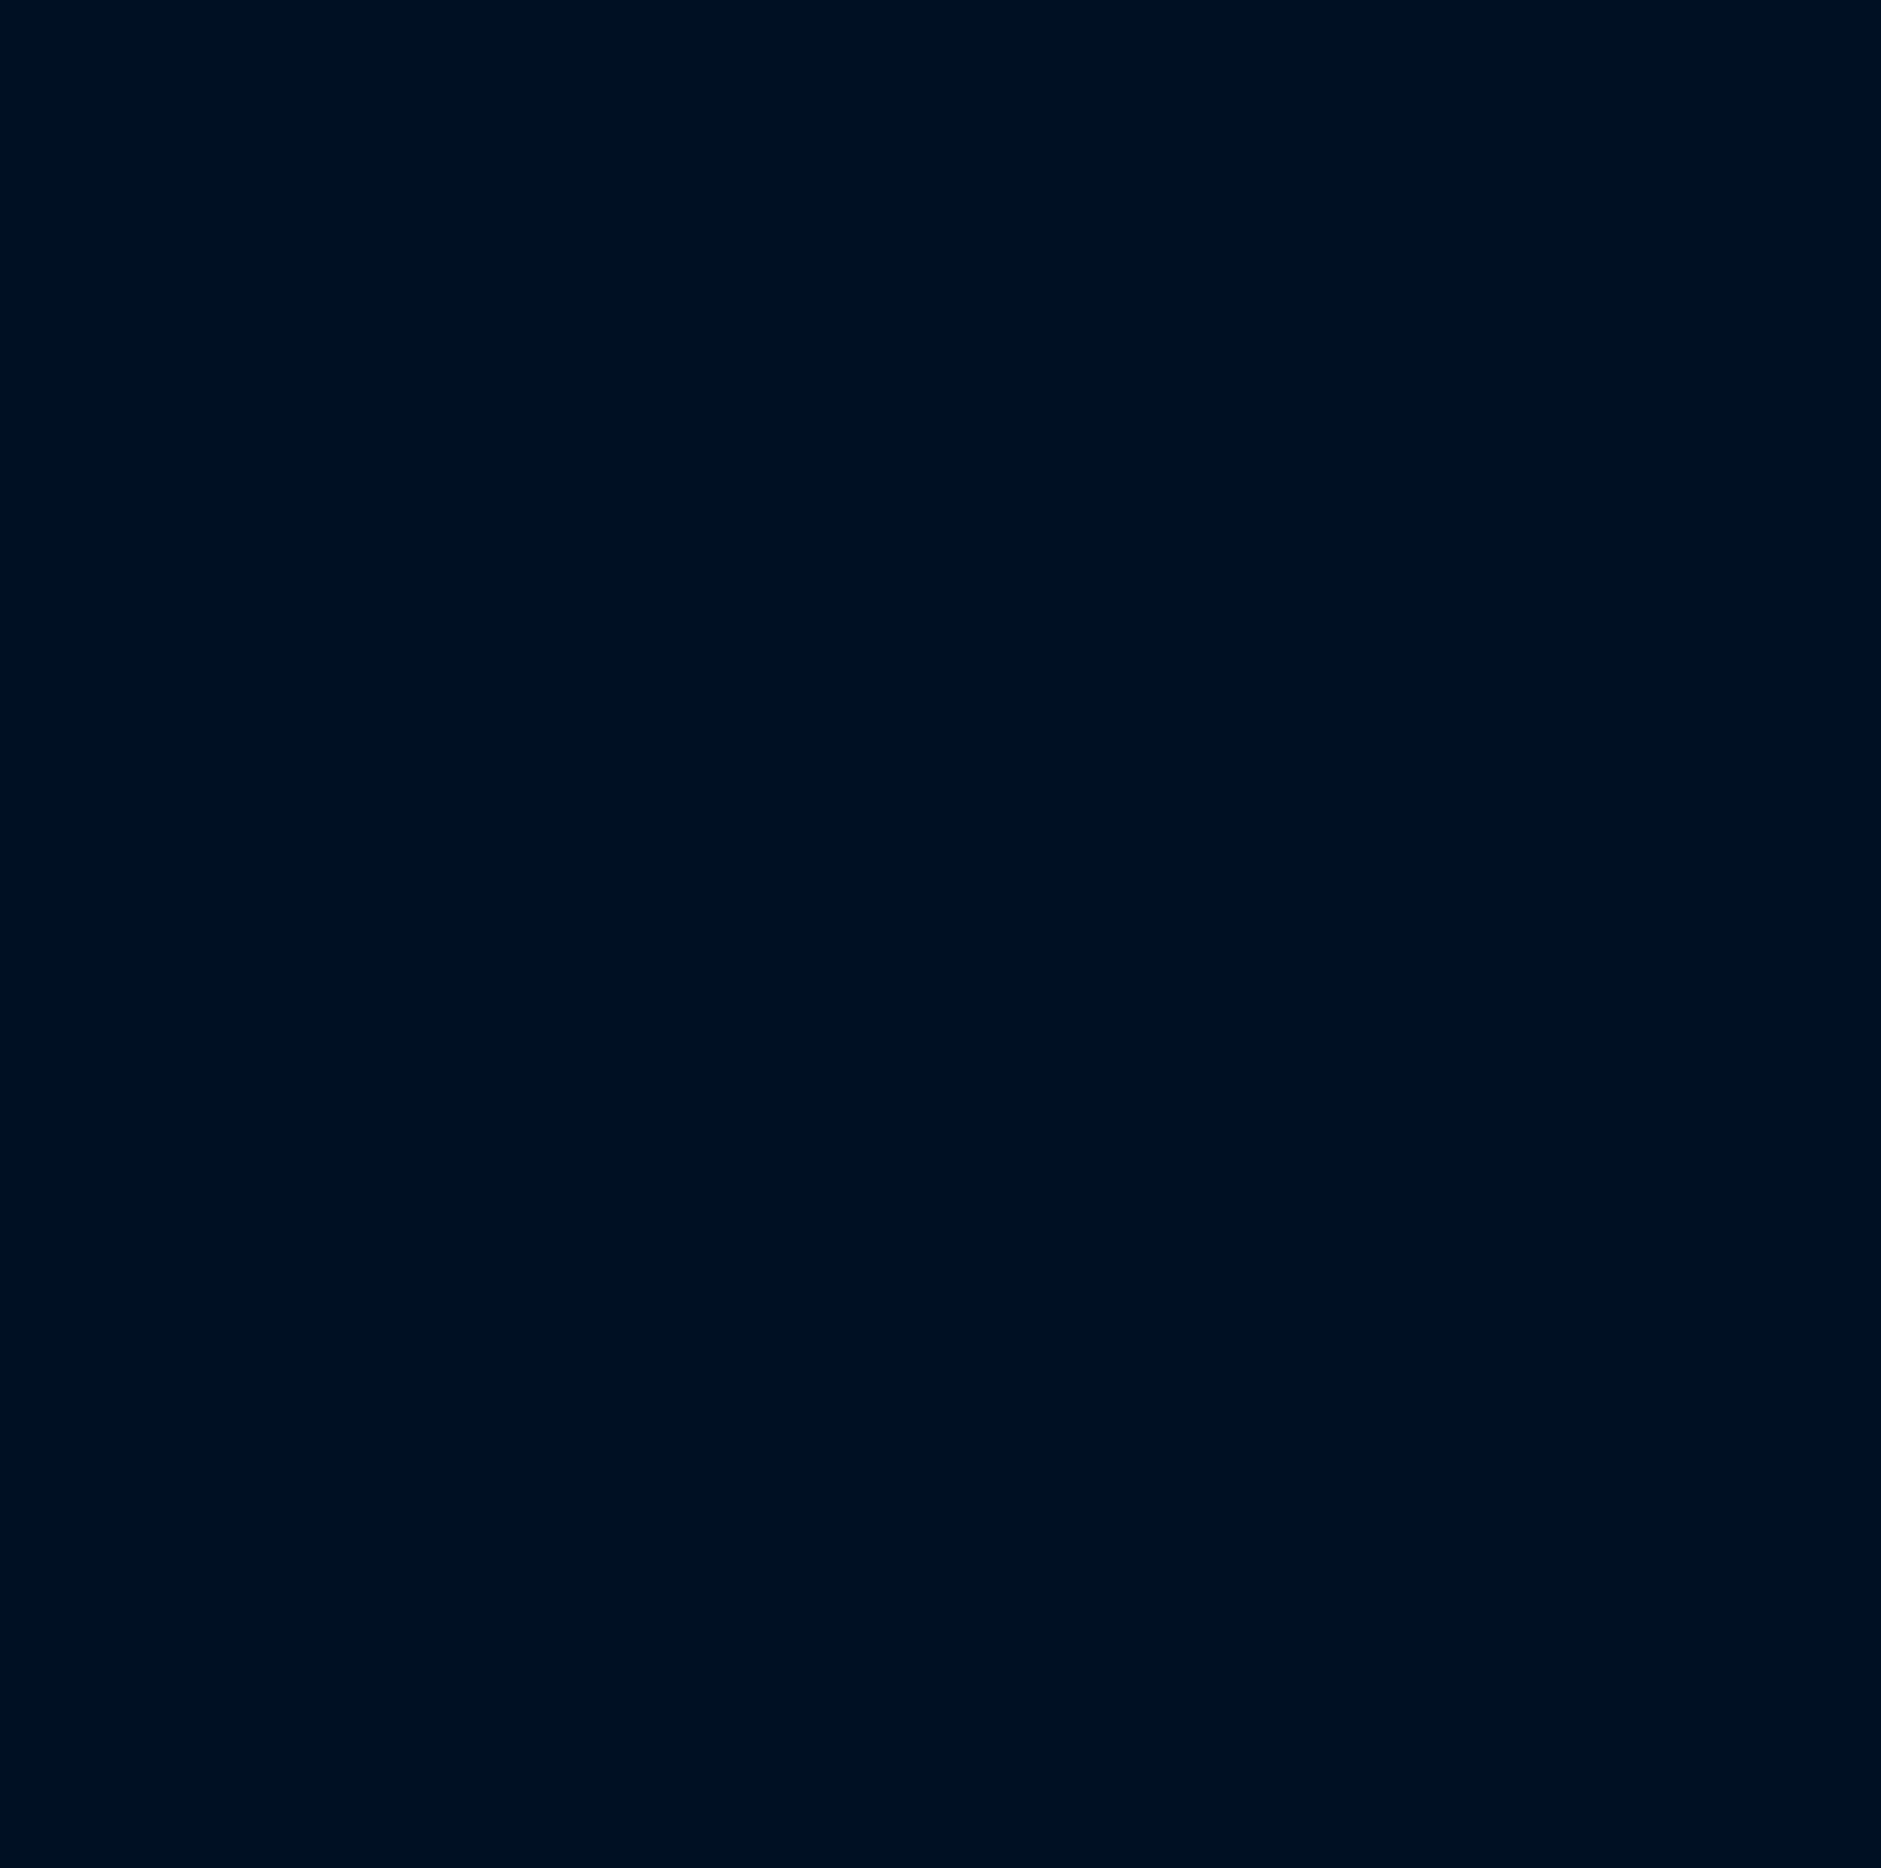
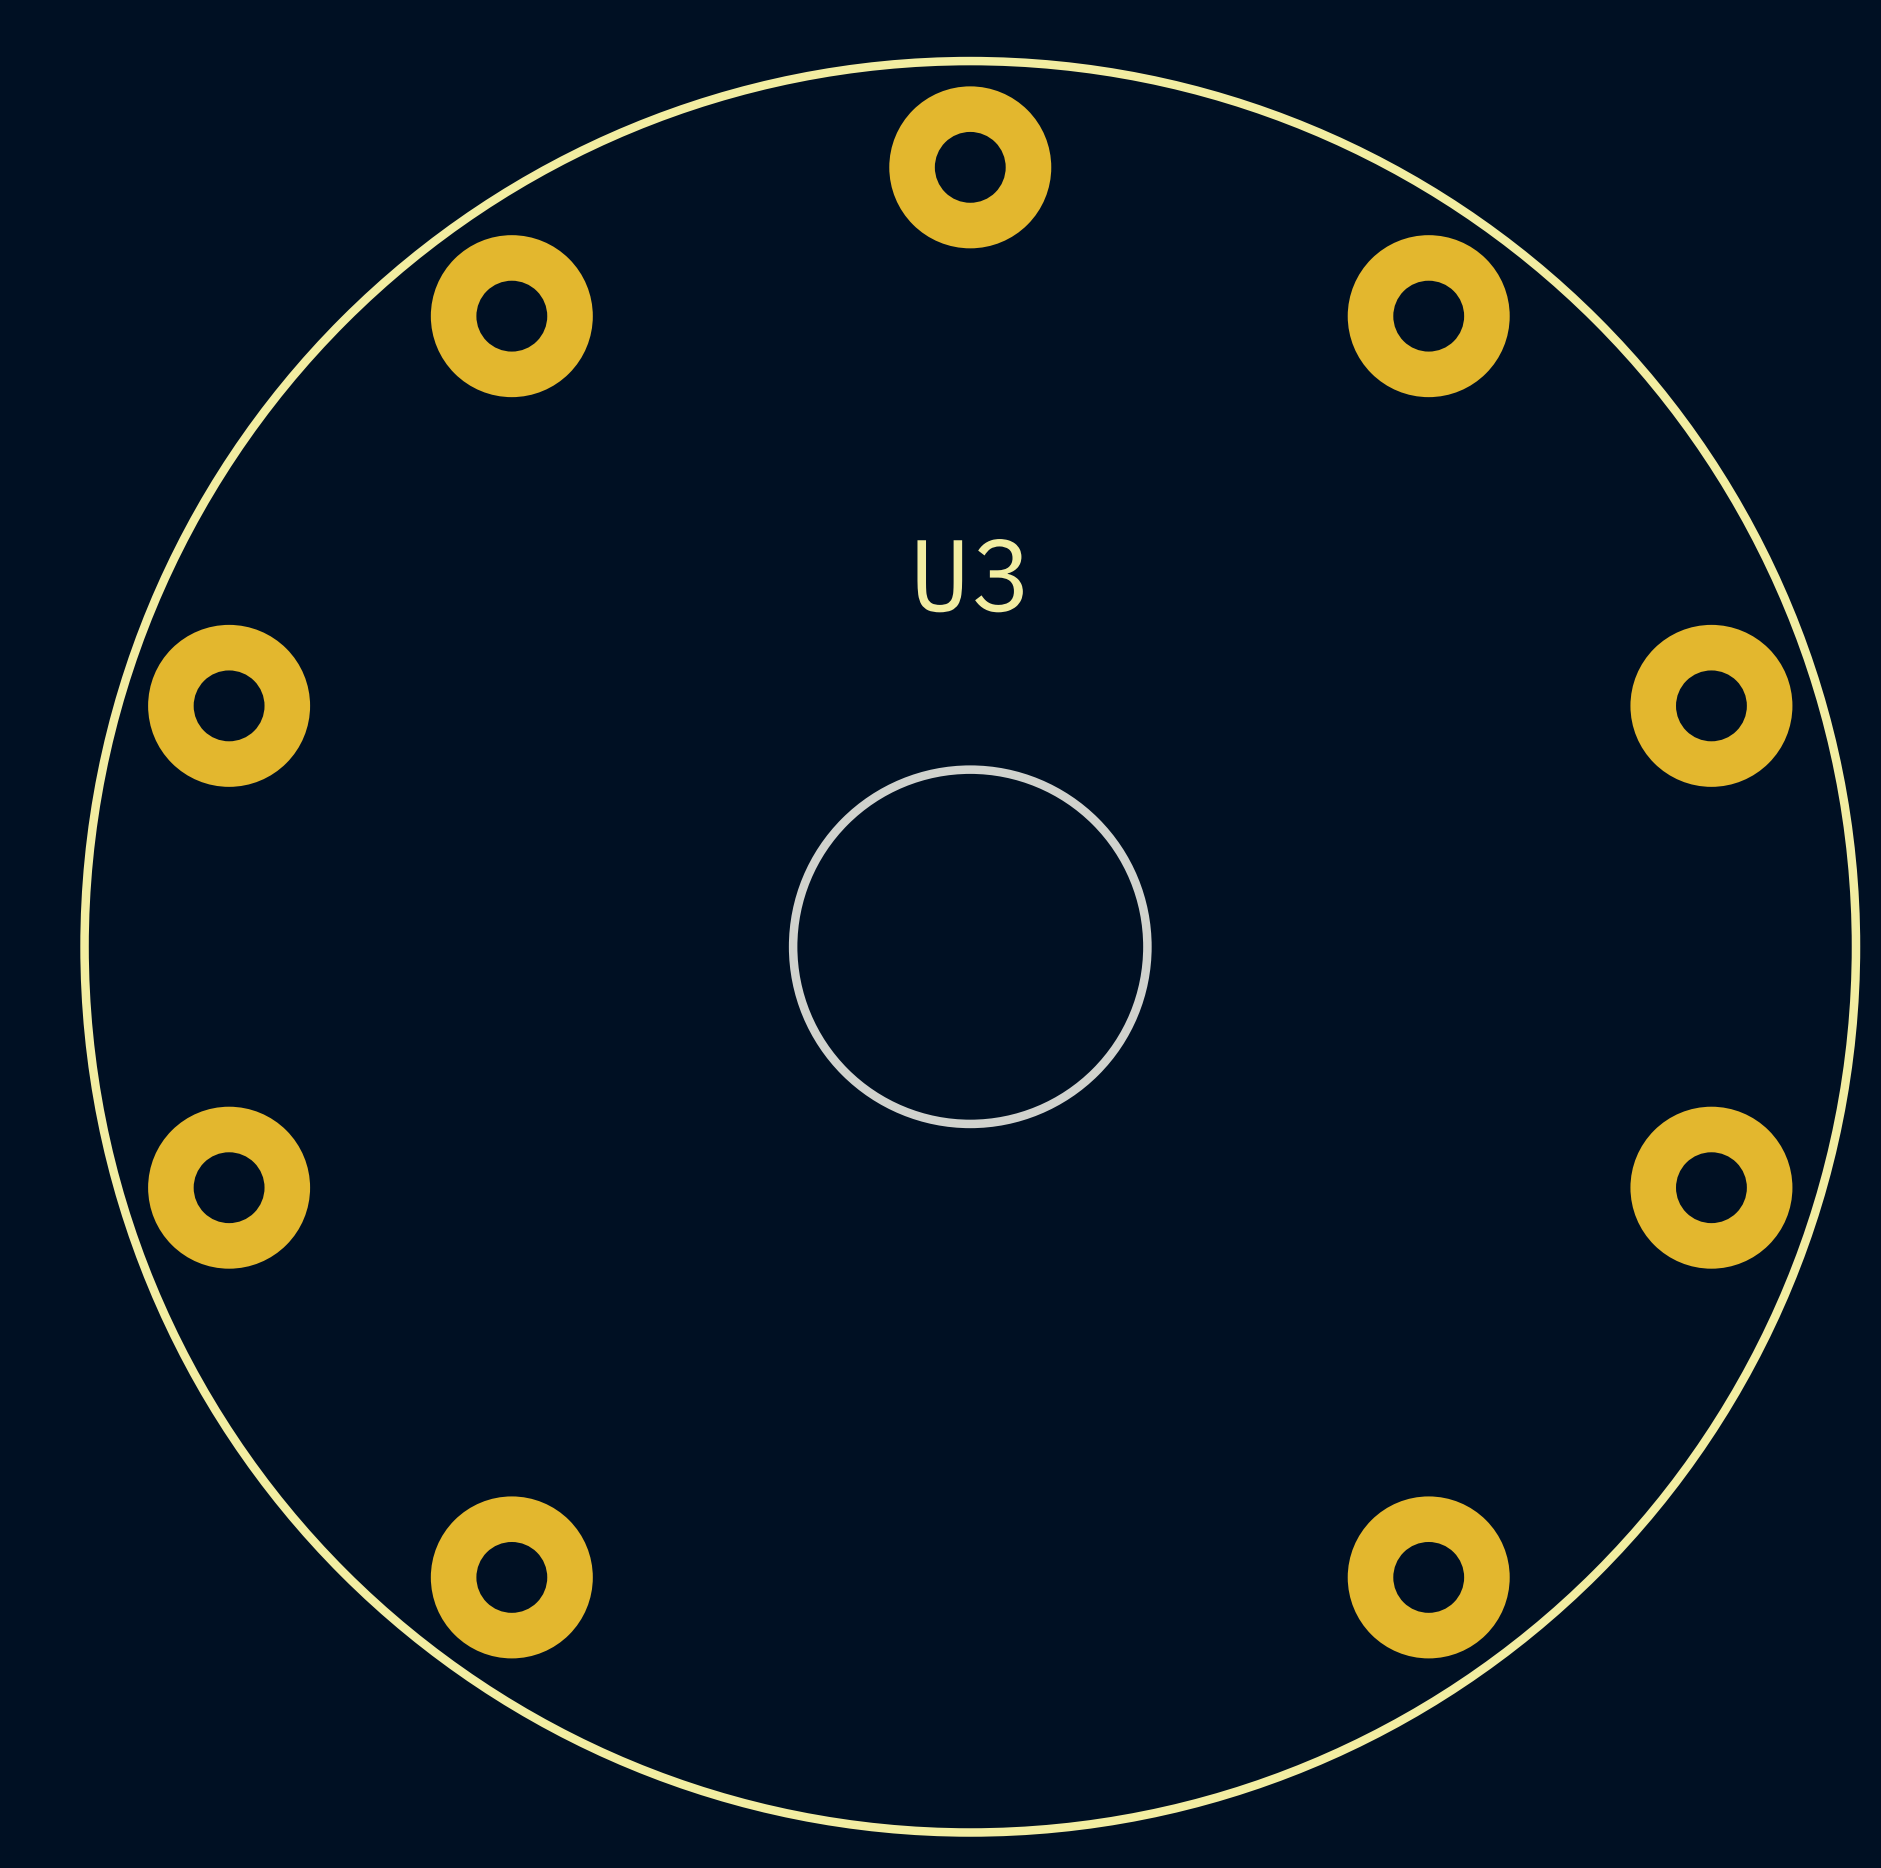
U3: none -> (970, 946)

